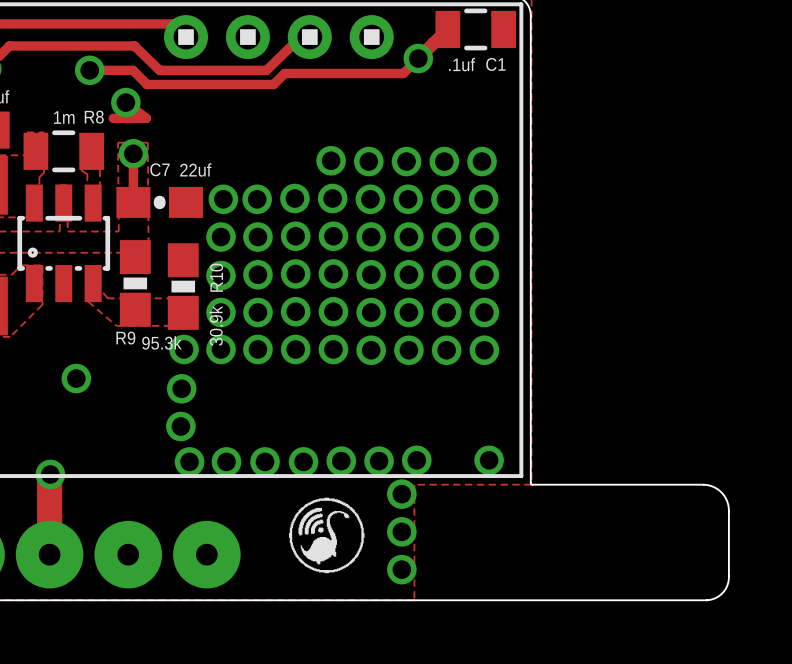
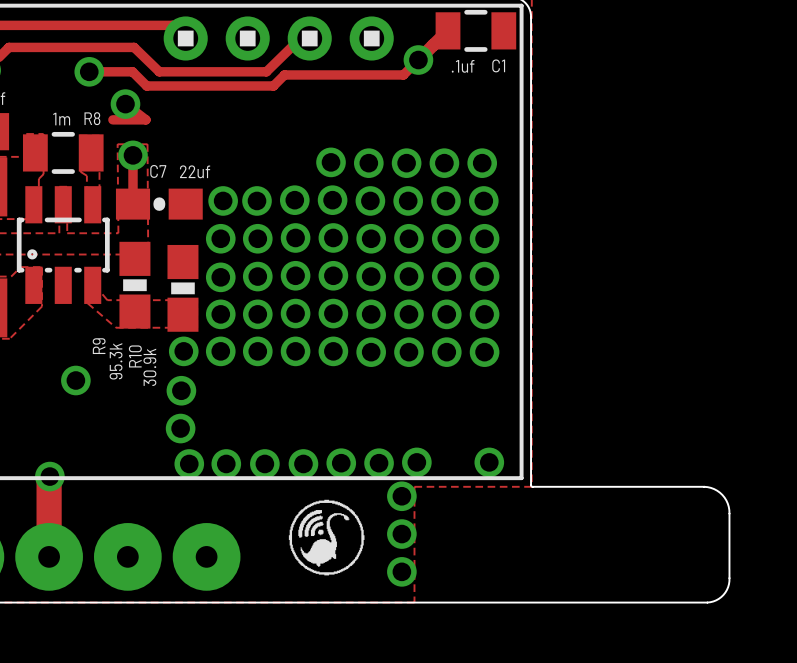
R10 name position: R10 (216, 277) -> R10 (135, 356)
R10 value position: 30.9k (216, 325) -> 30.9k (149, 367)
R9 name rotation: 0° (125, 338) -> 90° counterclockwise (99, 346)
R9 value rotation: 0° (161, 342) -> 90° counterclockwise (116, 361)

